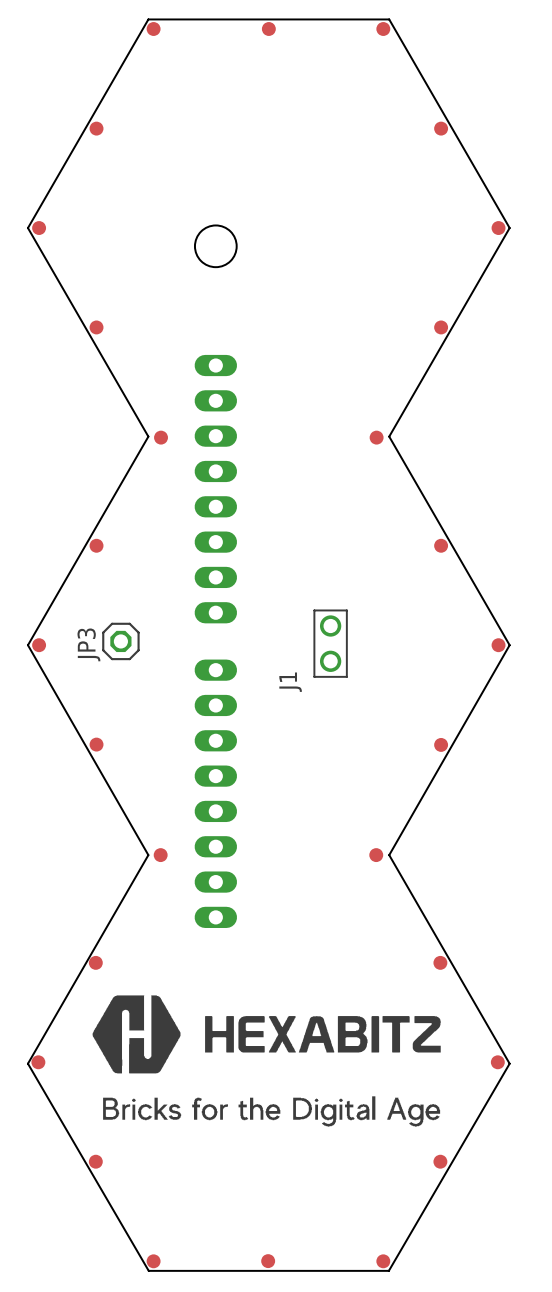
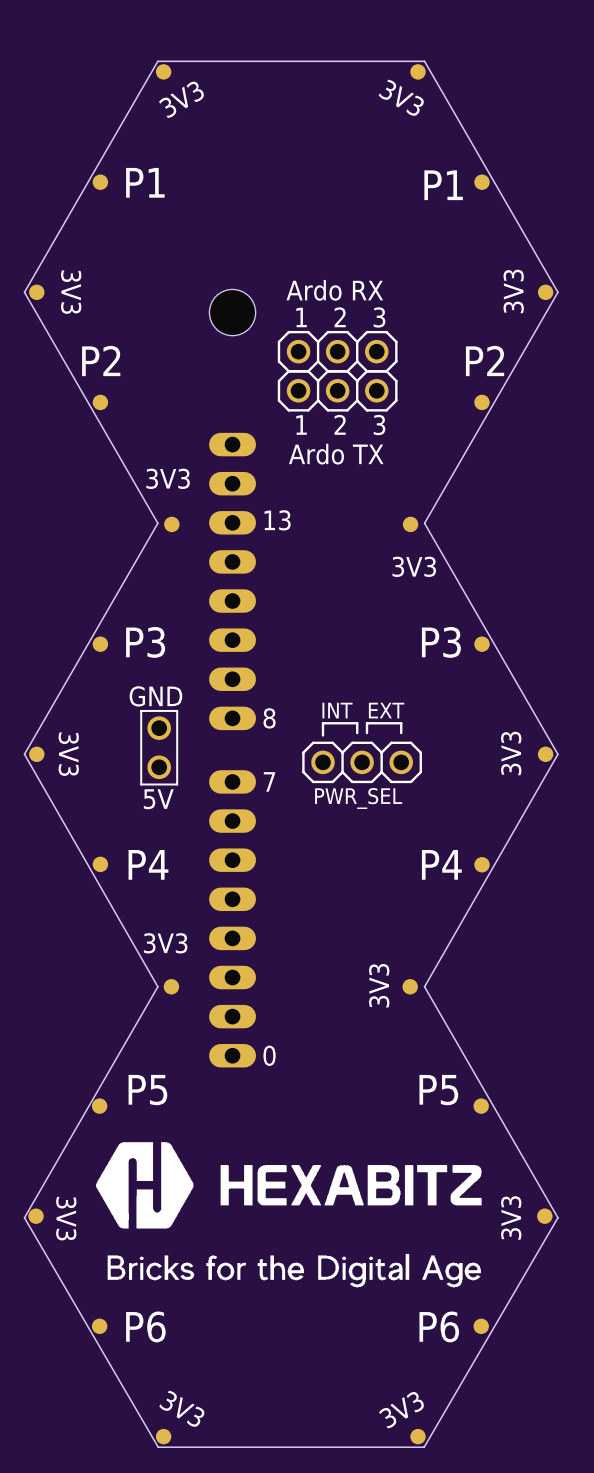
part footprint: [27, 18, 511, 1272] -> [23, 60, 559, 1448]
text: none -> 3V3 (401, 97)
text: none -> 3V3 (181, 99)
text: none -> P1 (145, 182)
text: none -> P1 (443, 185)
text: none -> Ardo RX (334, 290)
text: none -> 3V3 (71, 292)
text: none -> 3V3 (513, 291)
text: none -> 1 (301, 317)
text: none -> 2 (340, 317)
text: none -> 3 (379, 317)
part: none -> (337, 351)
text: none -> P2 (101, 360)
text: none -> P2 (485, 360)
part: none -> (337, 390)
text: none -> 1 (301, 425)
text: none -> 2 (340, 424)
text: none -> 3 (379, 425)
text: none -> Ardo TX (336, 454)
text: none -> 3V3 (168, 478)
text: none -> 13 (277, 520)
text: none -> 3V3 (414, 566)
text: none -> P3 (145, 642)
text: none -> P3 (441, 642)
text: none -> GND (155, 696)
text: none -> INT (337, 710)
text: none -> EXT (386, 710)
text: none -> 8 (269, 718)
line: none -> (357, 733) (357, 723) (322, 723) (322, 735)
line: none -> (366, 733) (366, 723) (401, 723) (401, 733)
part: none -> (159, 747)
JP3: (120, 641) -> none
J1: (330, 643) -> none
text: none -> 3V3 (511, 753)
text: none -> 3V3 (68, 754)
part: none -> (362, 762)
text: none -> 7 (269, 781)
text: none -> 5V (158, 799)
text: none -> PWR_SEL (358, 798)
text: none -> P4 (148, 864)
text: none -> P4 (441, 864)
text: none -> 3V3 (165, 943)
text: none -> 3V3 (379, 985)
text: none -> 0 (269, 1055)
text: none -> P5 (147, 1090)
text: none -> P5 (438, 1090)
text: none -> 3V3 (511, 1217)
text: none -> 3V3 (66, 1218)
text: none -> P6 (145, 1326)
text: none -> P6 (439, 1326)
text: none -> 3V3 (182, 1408)
text: none -> 3V3 (401, 1410)

